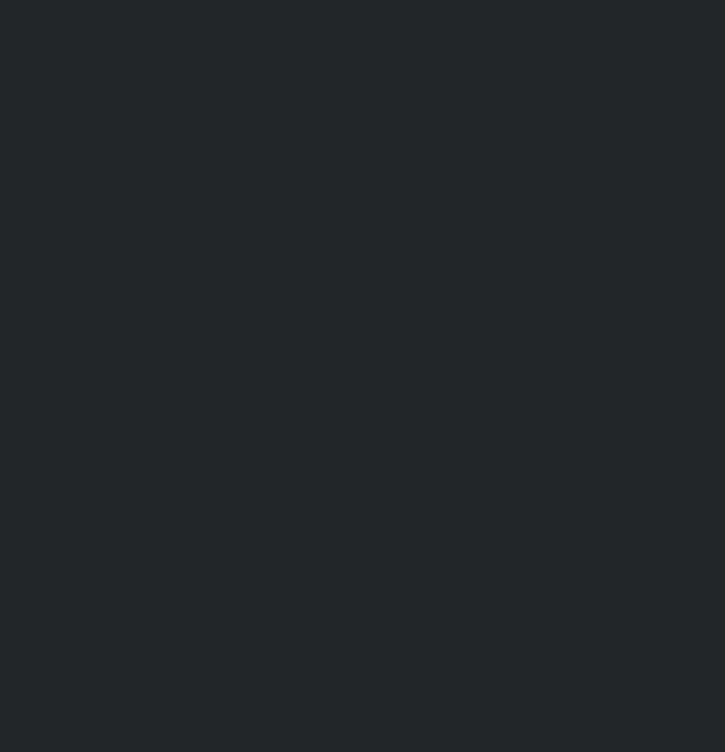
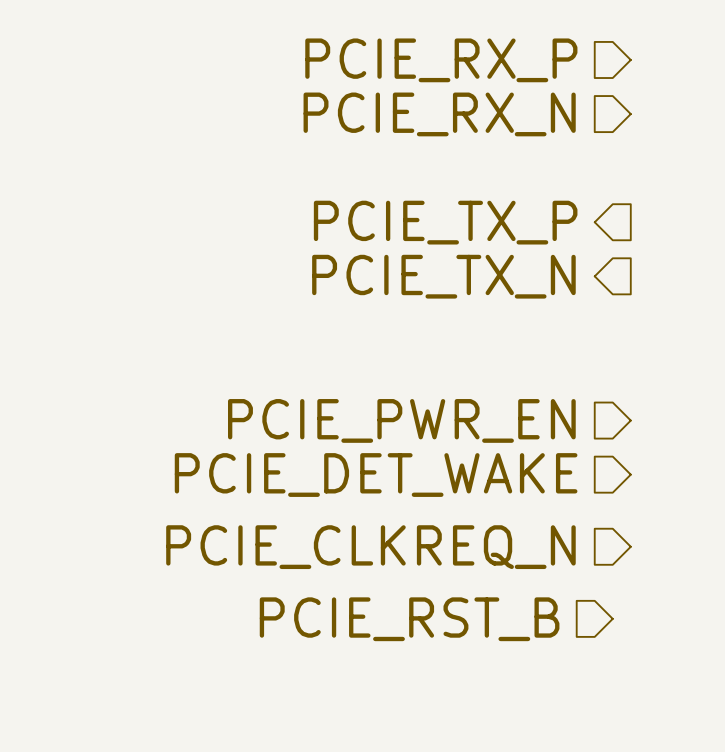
hierarchical label: none -> PCIE_RX_P (441, 60)
hierarchical label: none -> PCIE_RX_N (439, 114)
hierarchical label: none -> PCIE_TX_P (445, 222)
hierarchical label: none -> PCIE_TX_N (443, 276)
hierarchical label: none -> PCIE_PWR_EN (401, 420)
hierarchical label: none -> PCIE_DET_WAKE (376, 475)
hierarchical label: none -> PCIE_CLKREQ_N (370, 547)
hierarchical label: none -> PCIE_RST_B (409, 619)

